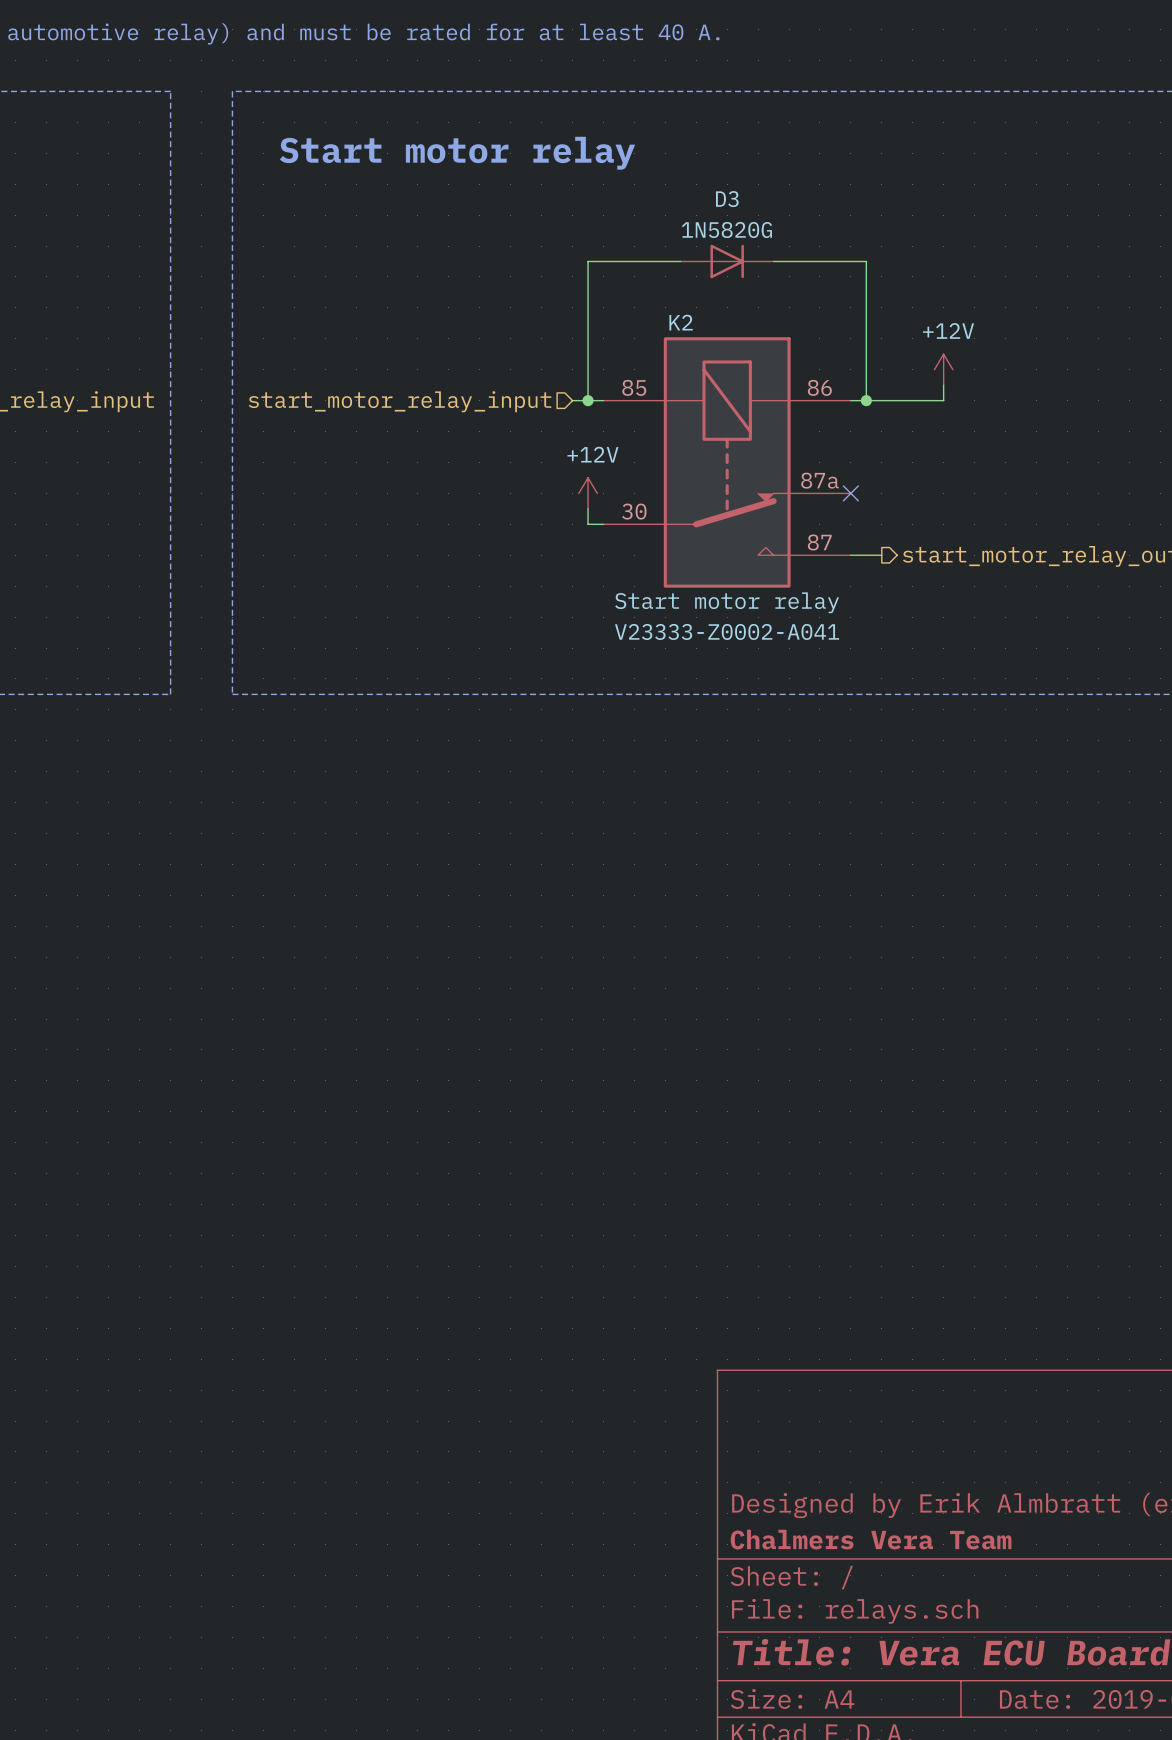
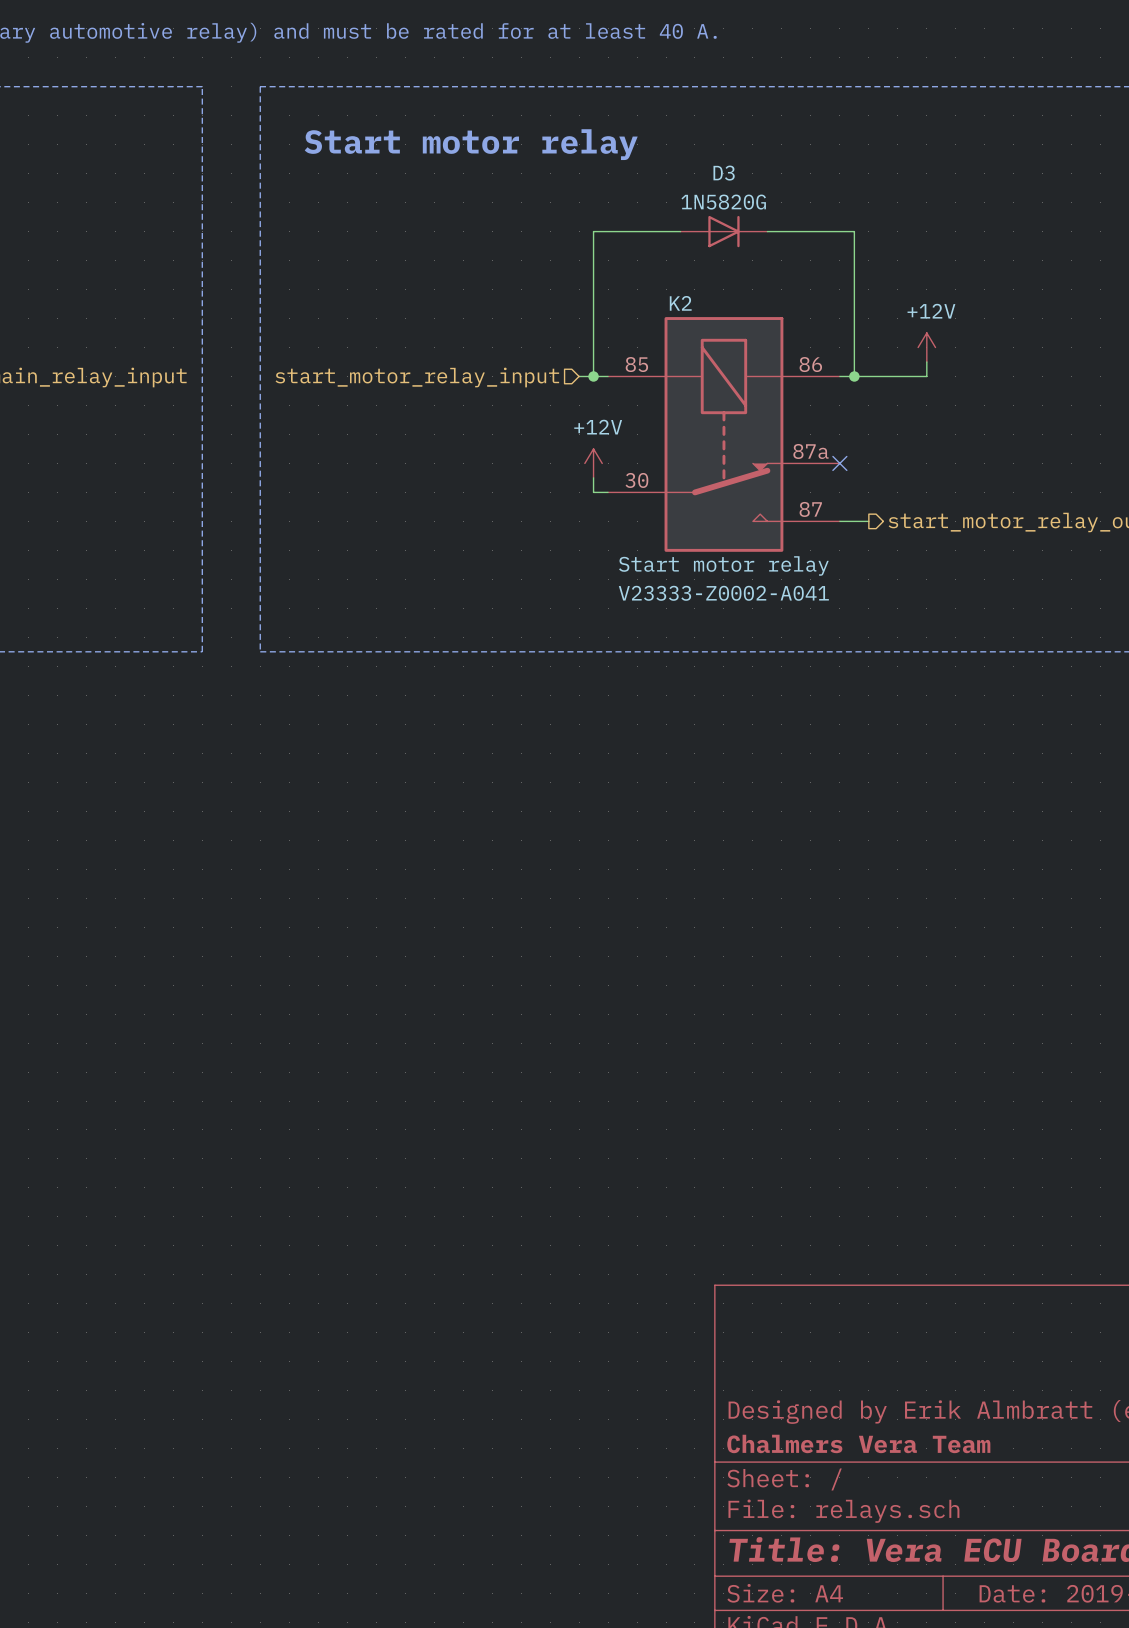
wire: (588, 261) (680, 261) -> (593, 246) (593, 231) (680, 231)
D3 position: (727, 261) -> (723, 231)
wire: (773, 261) (866, 261) -> (767, 231) (854, 231) (854, 246)

